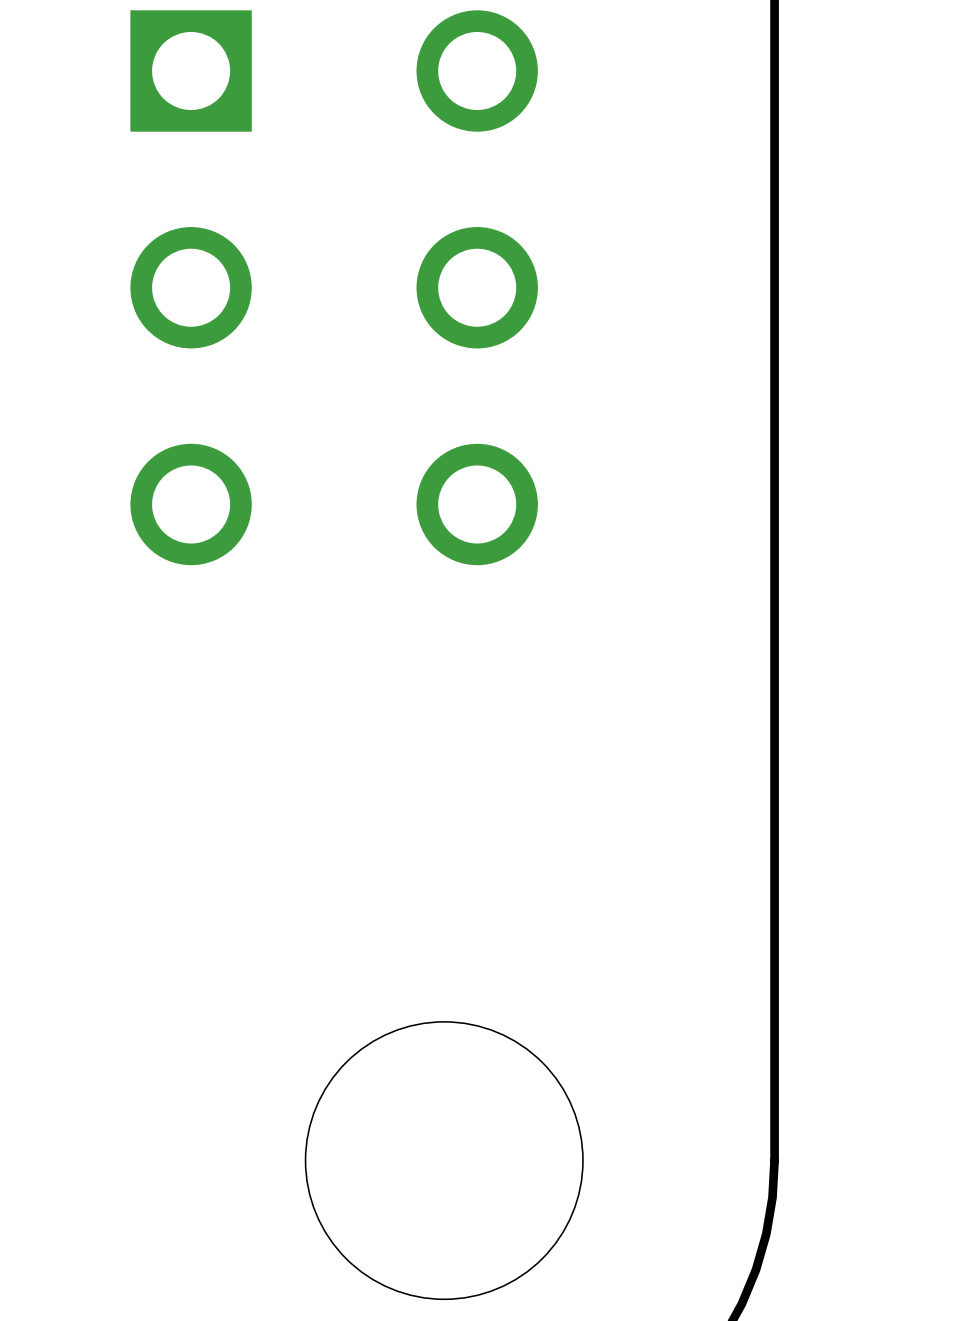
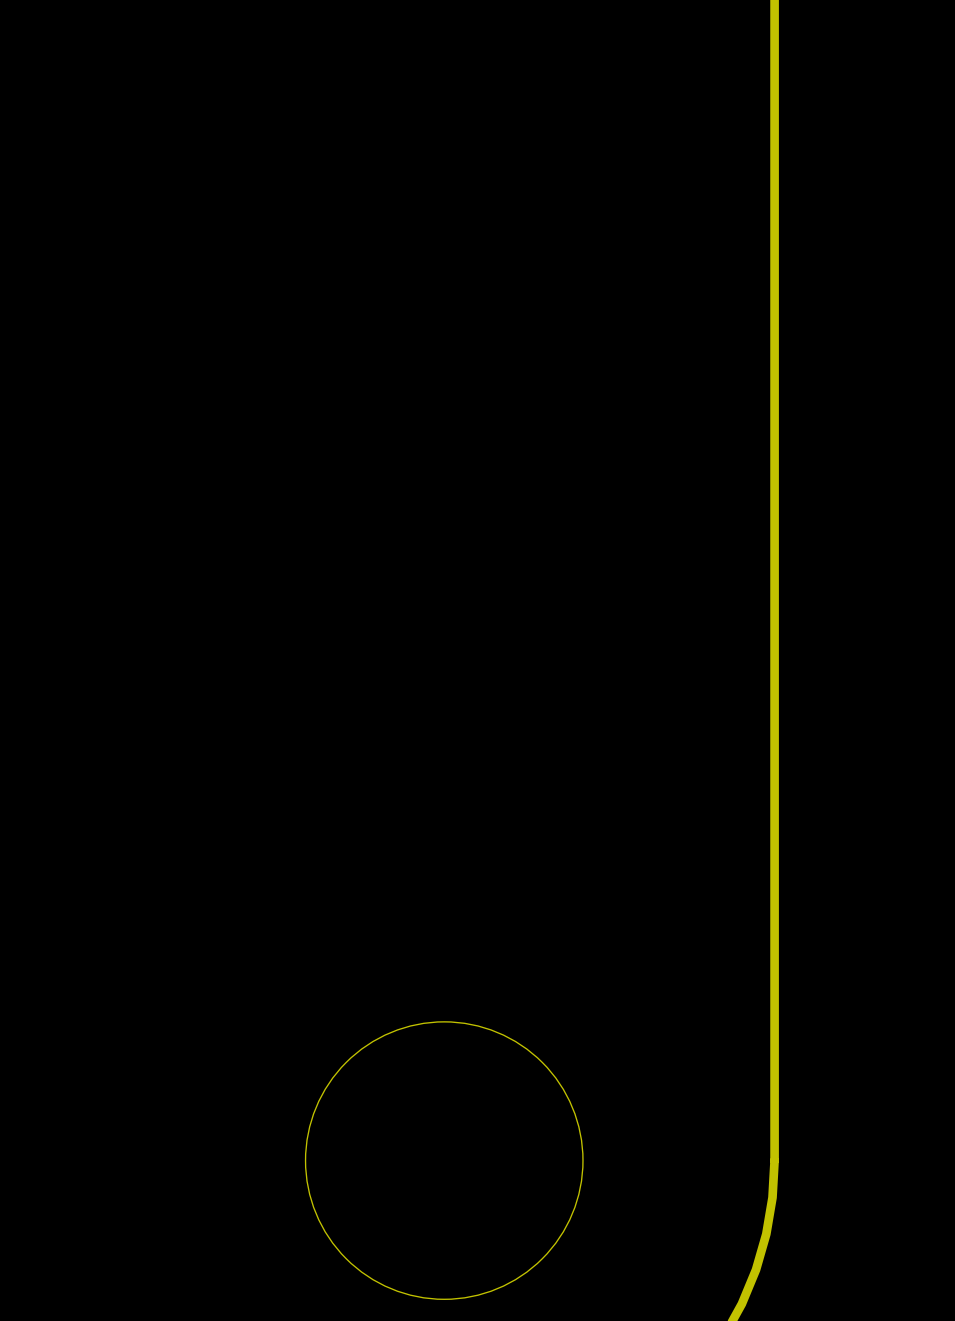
part: (334, 287) -> none

